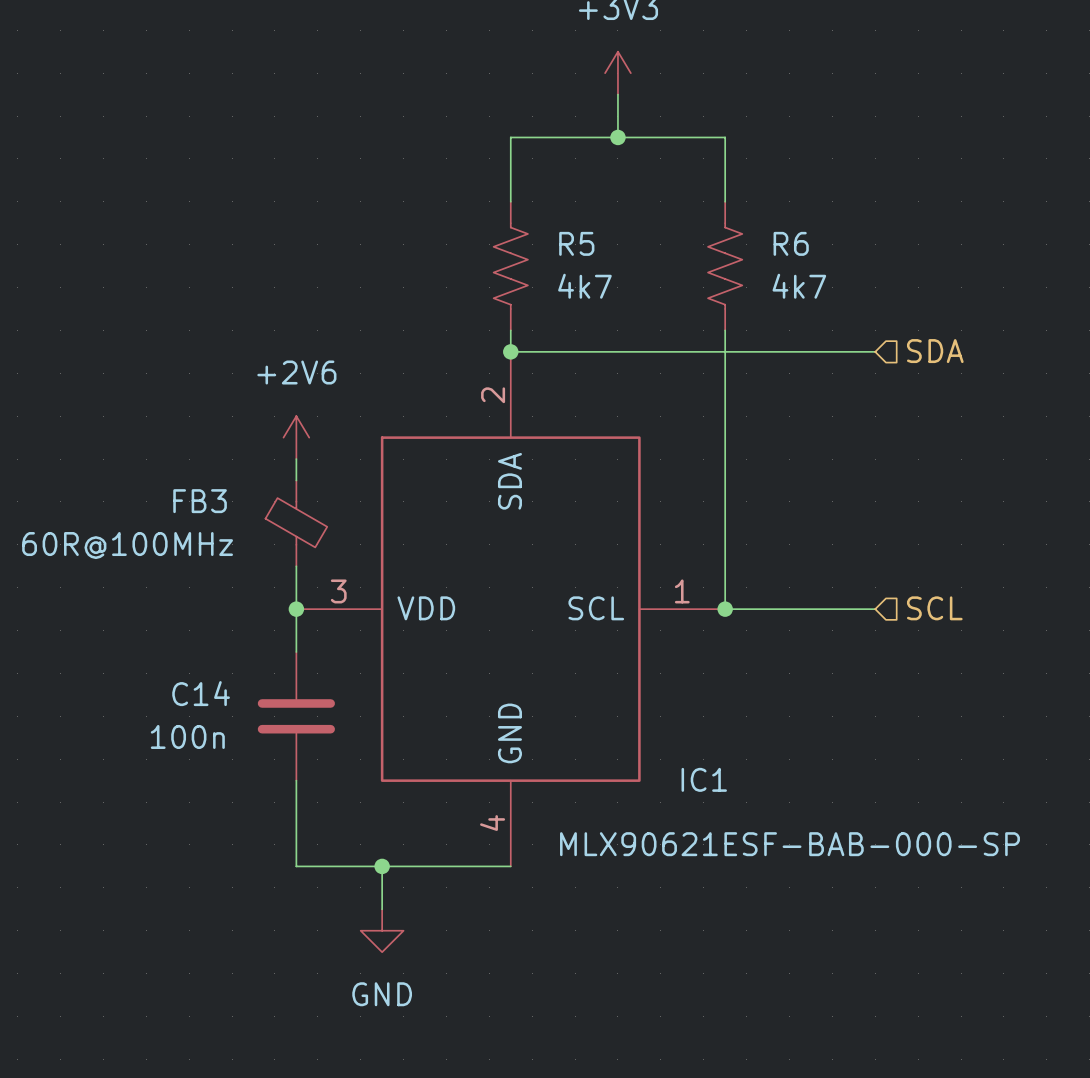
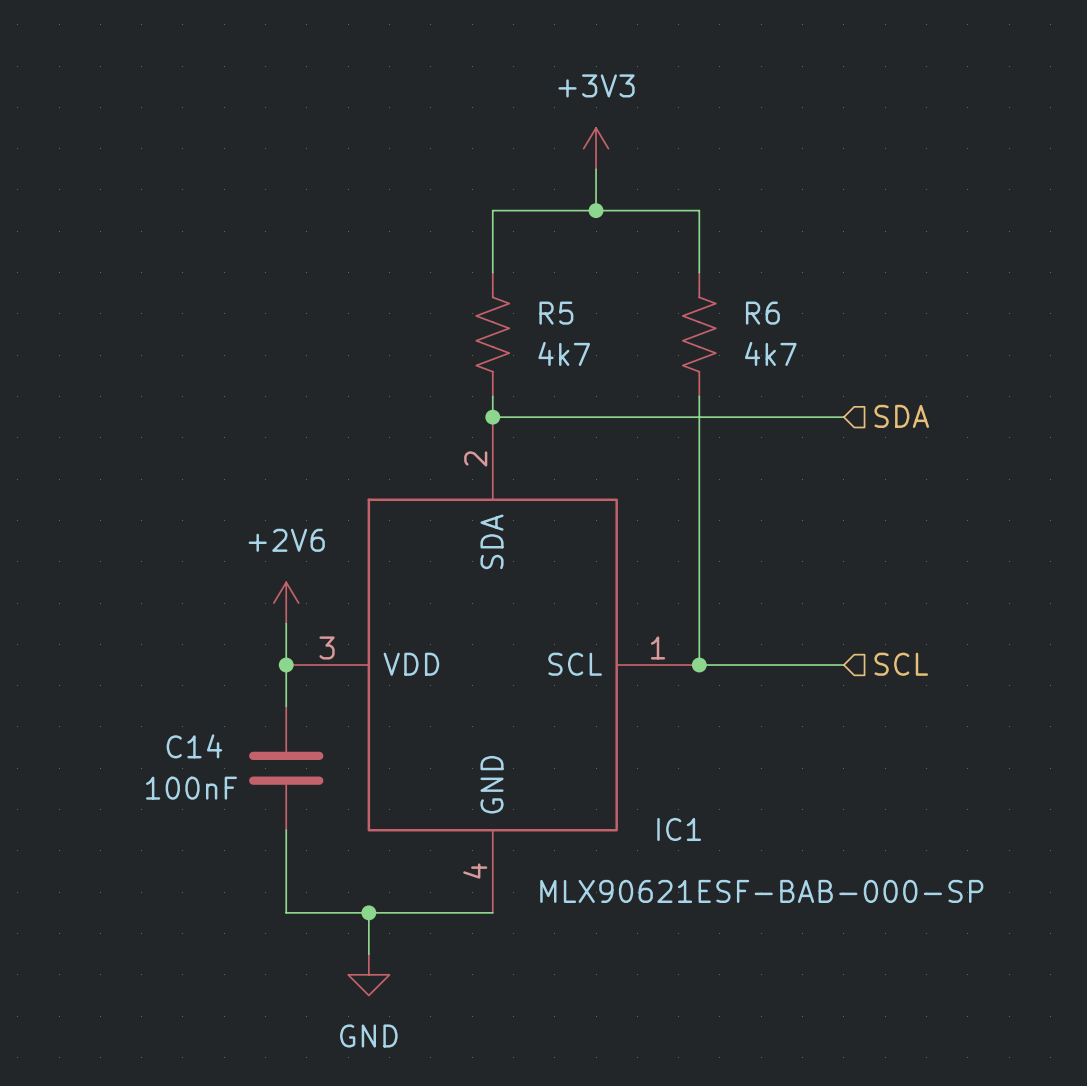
power symbol position: +2V6 (296, 437) -> +2V6 (286, 603)
wire: (296, 459) (296, 480) -> none
FB3: 60R@100MHz (296, 523) -> none
C14 value: 100n (187, 736) -> 100nF (191, 788)

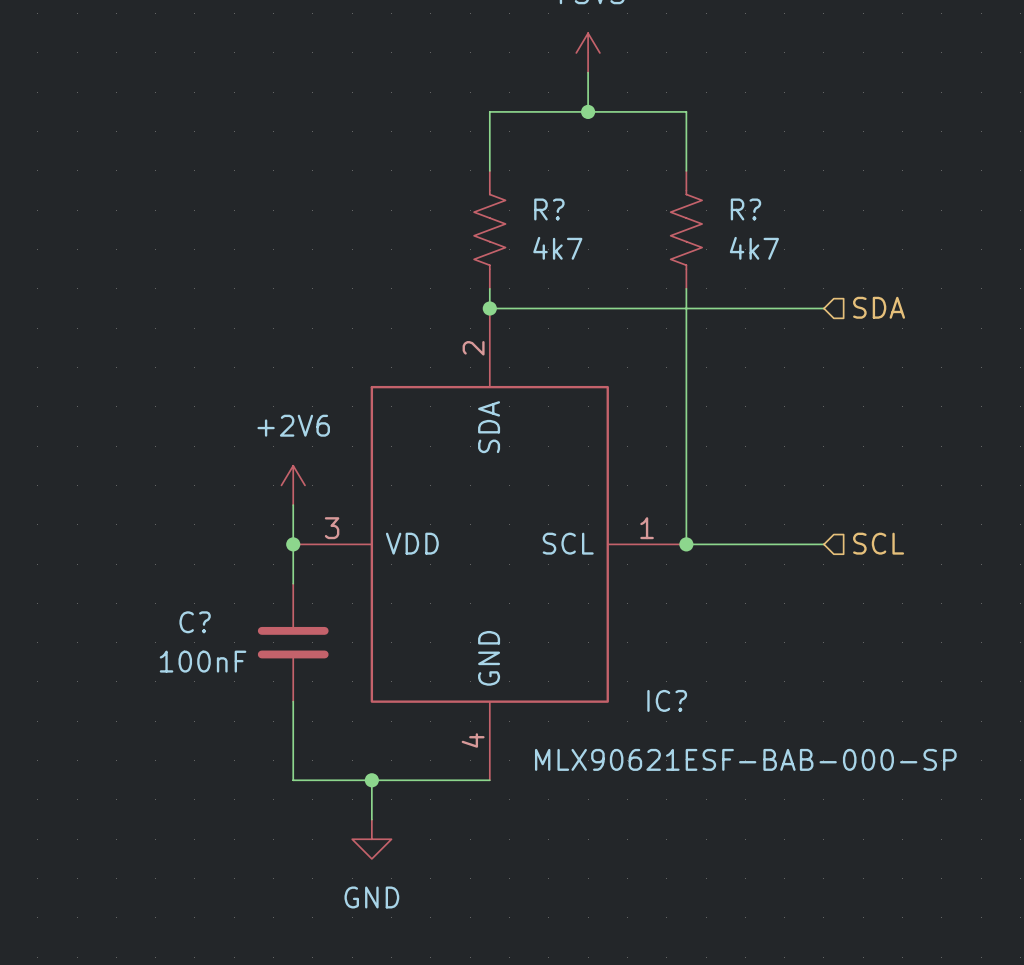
R5 name: R5 (556, 313) -> R? (549, 209)
R6 name: R6 (762, 313) -> R? (745, 209)
C14 name: C14 (194, 746) -> C? (195, 622)
IC1 name: IC1 (679, 829) -> IC? (667, 700)

